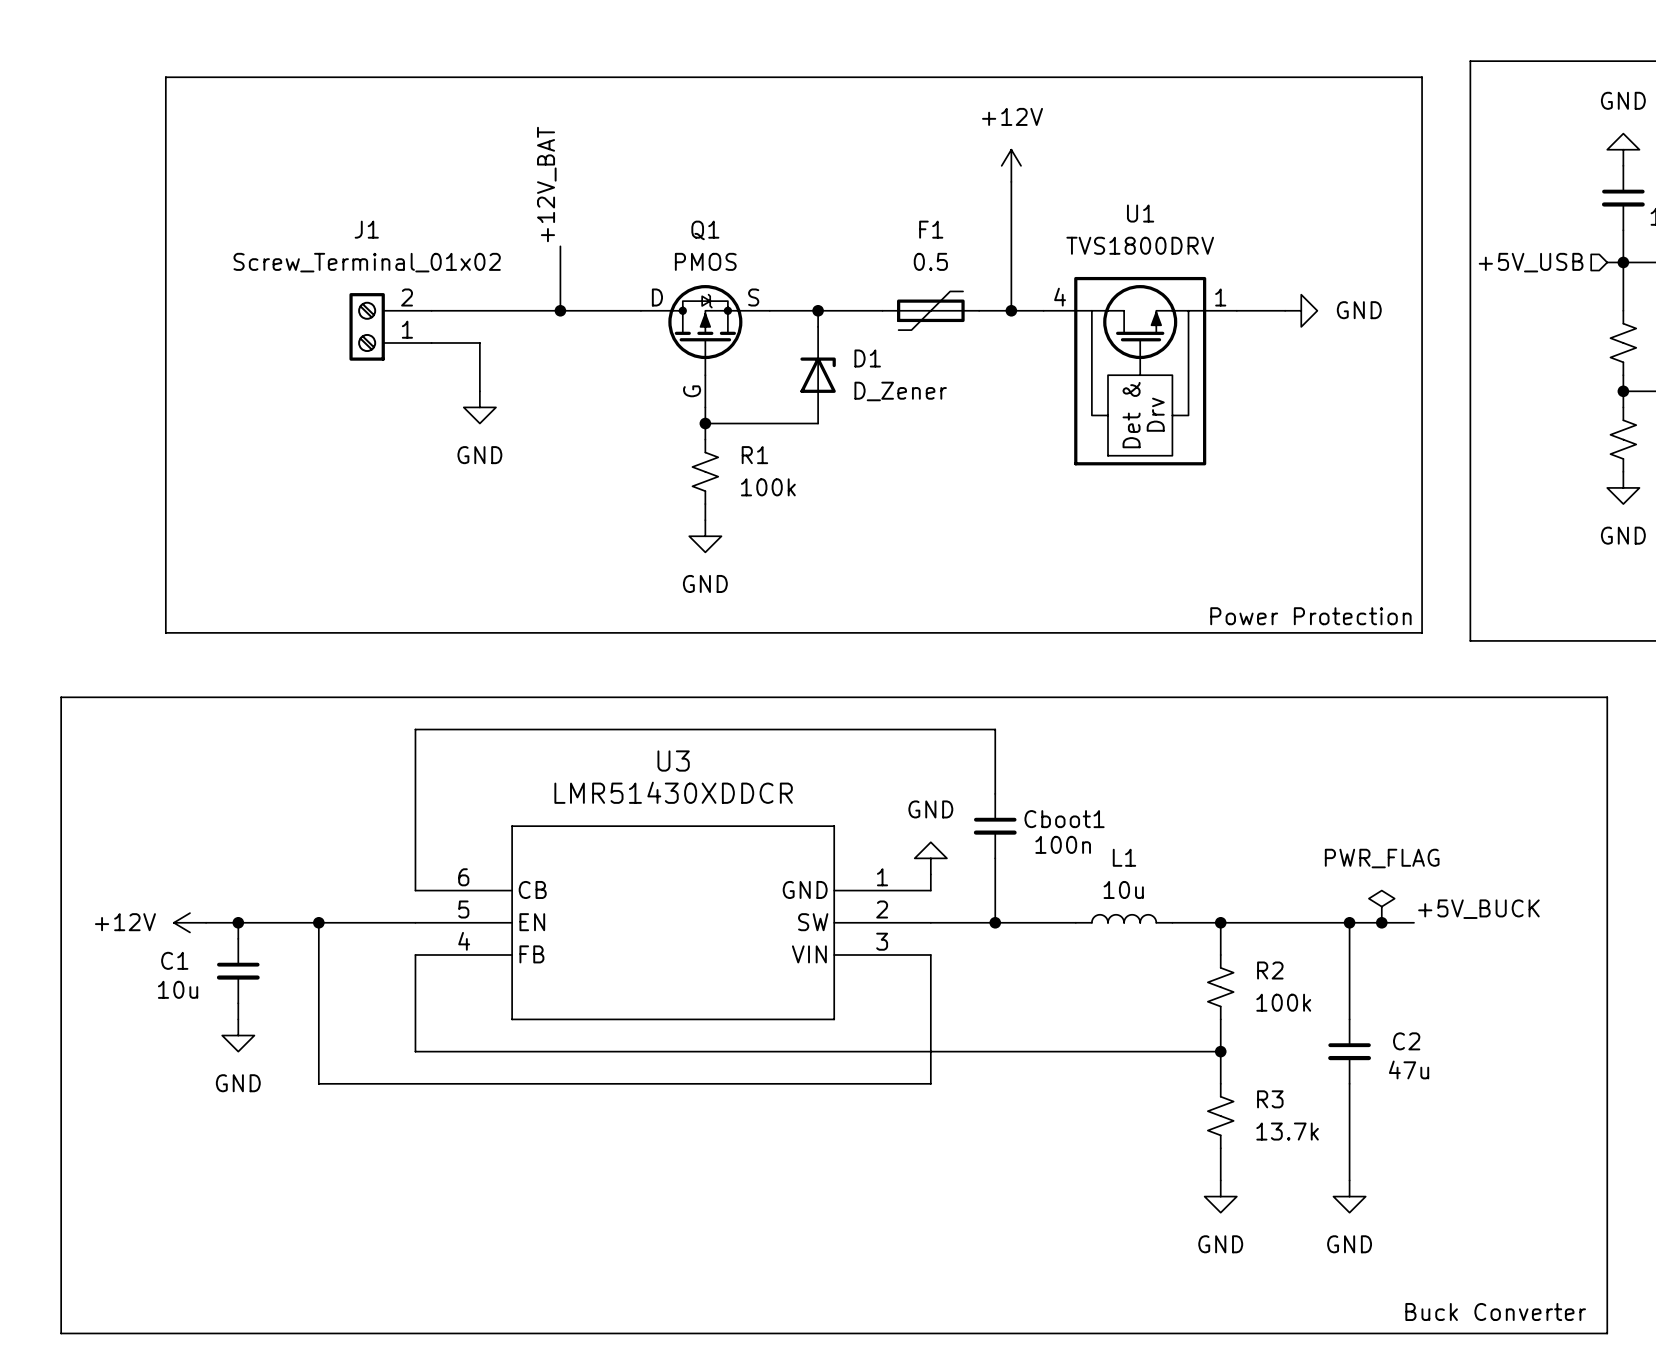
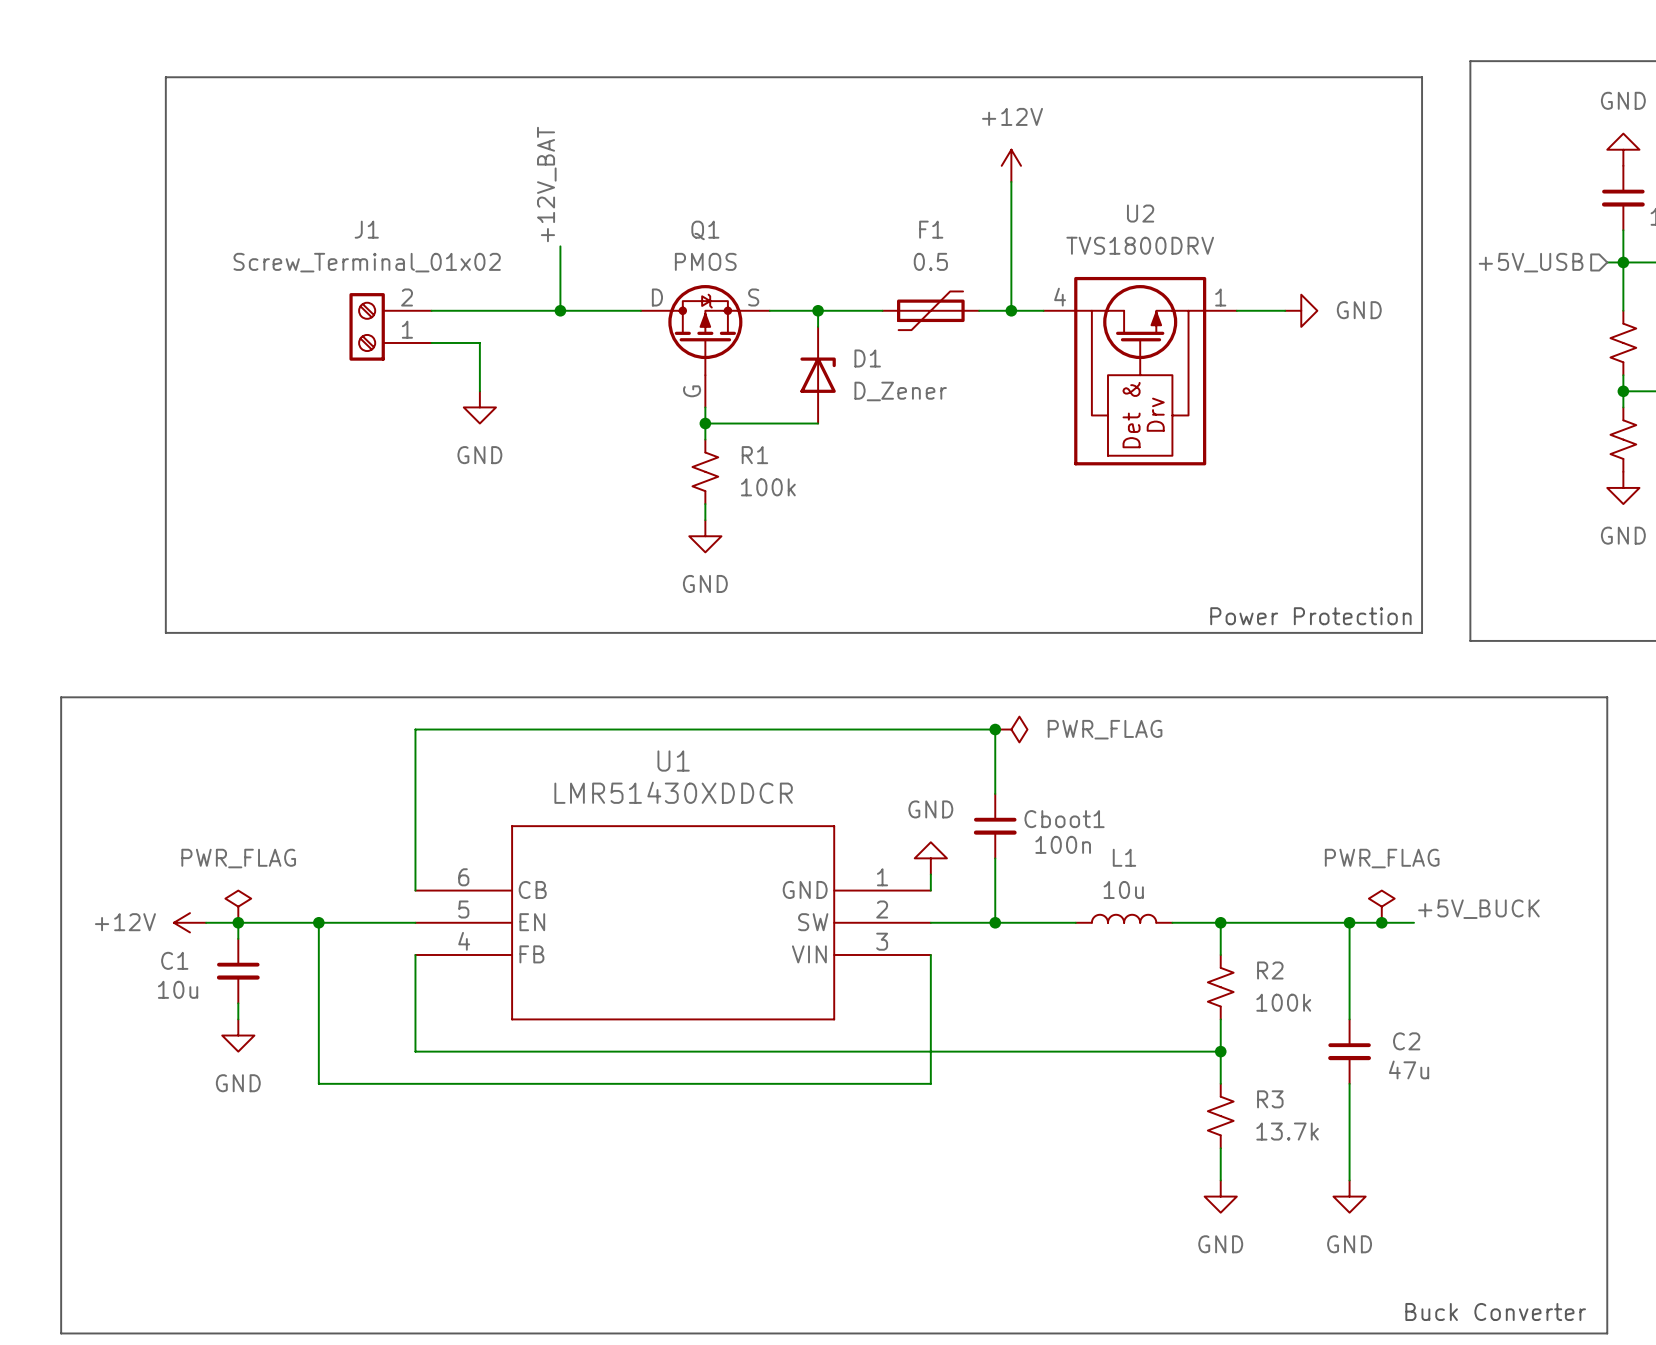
U1 name: U1 (1140, 213) -> U2 (1140, 213)
junction: none -> (995, 729)
power symbol: none -> PWR_FLAG (1011, 729)
U3 name: U3 (673, 761) -> U1 (673, 761)
power symbol: none -> PWR_FLAG (238, 906)

